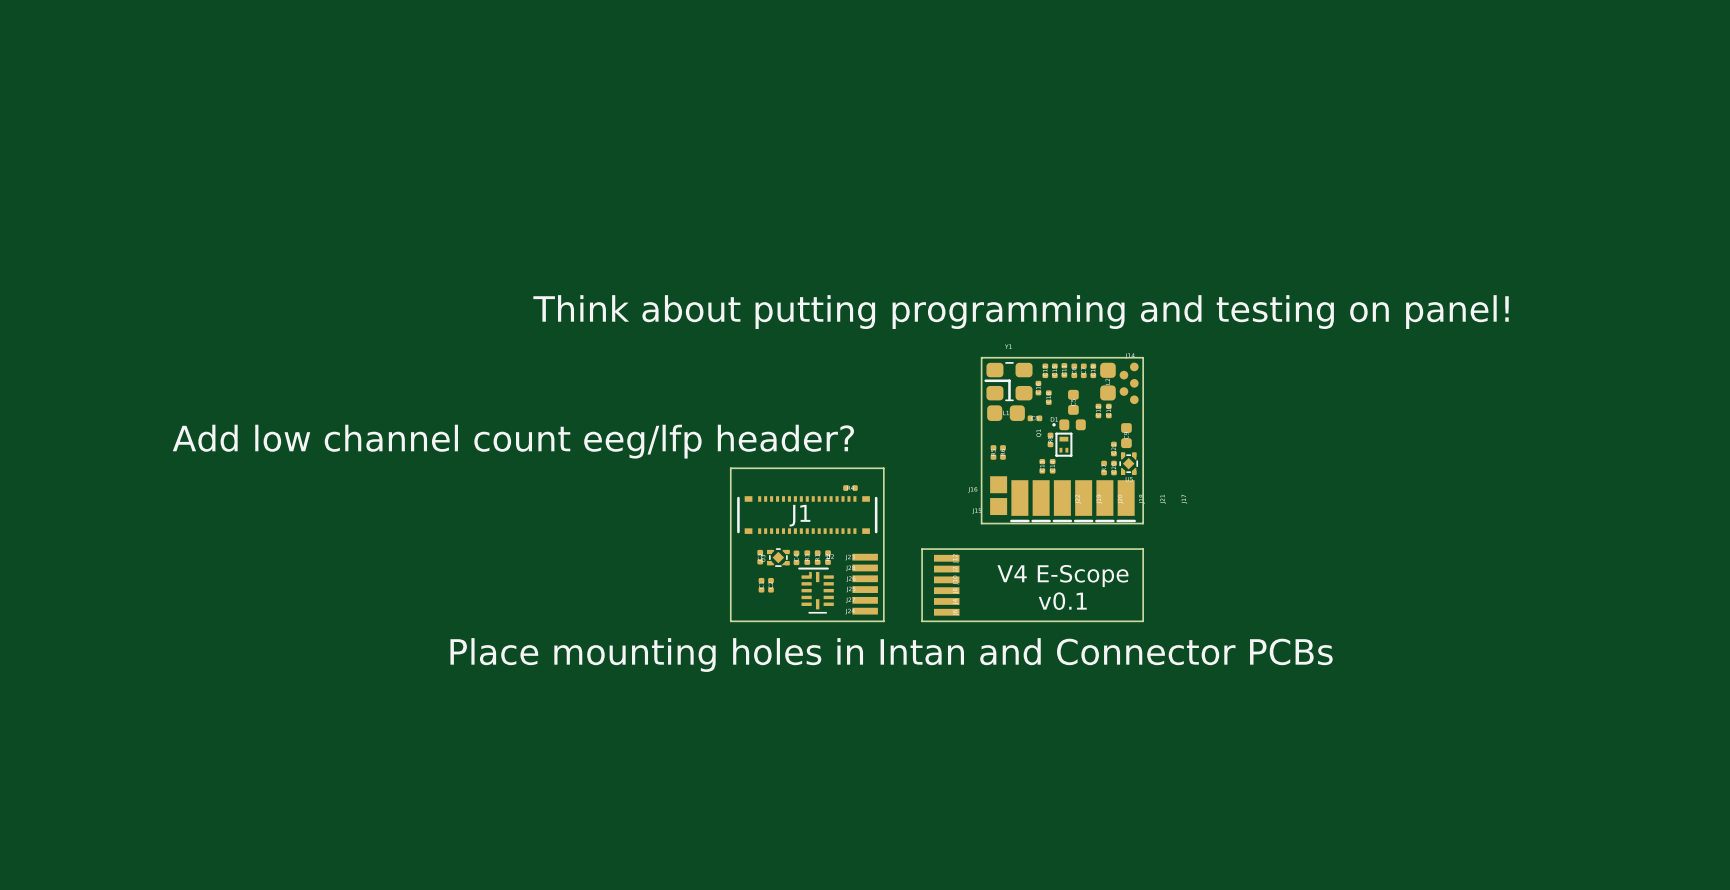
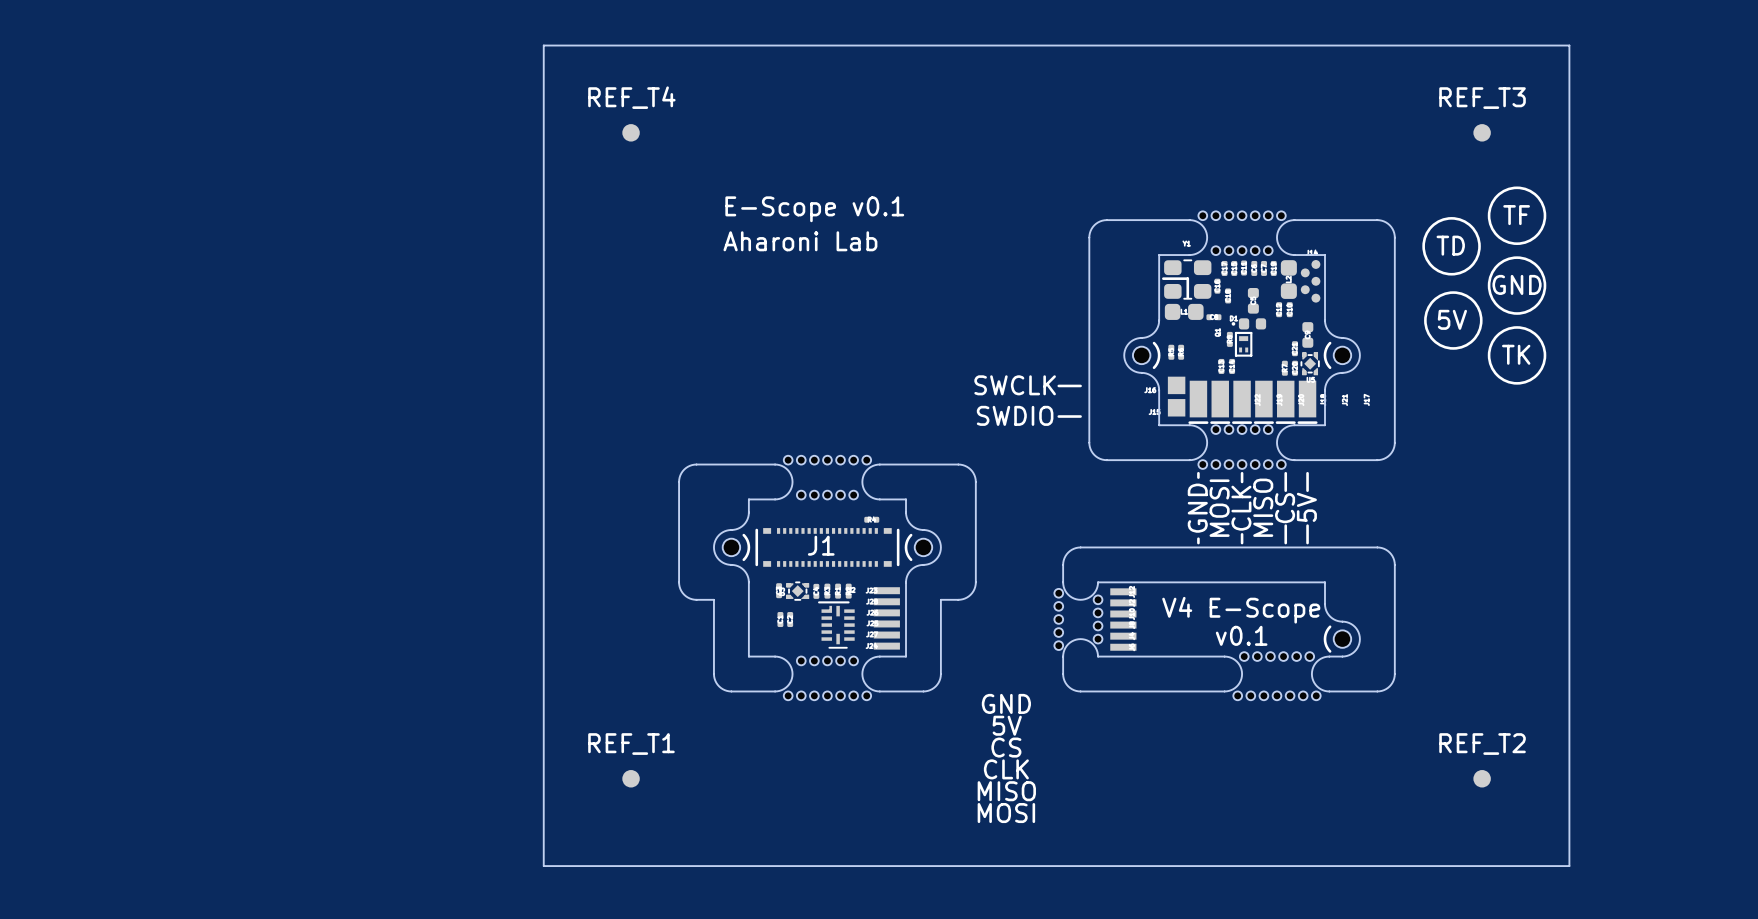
board edge: none -> (543, 45) (543, 866) (1569, 866) (1569, 45) (543, 45)
REF_T4: none -> (631, 132)
REF_T3: none -> (1482, 132)
drawing: none -> [1422, 186, 1547, 385]
text: none -> E-Scope v0.1 (814, 209)
part: none -> (1202, 215)
part: none -> (1215, 215)
part: none -> (1228, 215)
part: none -> (1242, 215)
part: none -> (1255, 215)
part: none -> (1268, 215)
part: none -> (1281, 215)
text: none -> TF (1516, 215)
board edge: none -> (1106, 220) (1191, 220) (1200, 223) (1205, 230) (1206, 242) (1198, 252) (1189, 255) (1159, 255) (1157, 327) (1150, 335) (1131, 341) (1126, 346) (1124, 355) (1126, 364) (1131, 369) (1148, 374) (1156, 381) (1159, 390) (1159, 425) (1191, 425) (1203, 432) (1207, 440) (1206, 447) (1203, 453) (1196, 458) (1104, 460) (1096, 456) (1090, 449) (1089, 235) (1094, 225) (1106, 220)
board edge: none -> (1294, 220) (1379, 220) (1388, 223) (1393, 230) (1394, 442) (1391, 453) (1384, 458) (1292, 460) (1283, 456) (1278, 449) (1277, 438) (1285, 427) (1294, 425) (1325, 425) (1325, 390) (1327, 381) (1335, 374) (1353, 369) (1359, 357) (1359, 350) (1354, 343) (1349, 339) (1333, 335) (1325, 325) (1325, 255) (1289, 254) (1282, 249) (1278, 244) (1277, 235) (1280, 226) (1287, 221) (1294, 220)
text: none -> Aharoni Lab (800, 241)
text: none -> TD (1450, 245)
part: none -> (1215, 250)
part: none -> (1228, 250)
part: none -> (1242, 250)
part: none -> (1255, 250)
part: none -> (1268, 250)
text: none -> GND (1517, 284)
text: none -> 5V (1452, 319)
text: Think about putting programming and testing on panel! (1021, 312) -> none
line: none -> (1154, 343) (1159, 355) (1154, 367)
line: none -> (1330, 343) (1325, 355) (1330, 367)
part: none -> (1141, 355)
part: none -> (1342, 355)
text: none -> TK (1516, 354)
board edge: (981, 357) (981, 523) (1143, 523) (1143, 357) (981, 357) -> none
text: none -> SWCLK (1015, 385)
line: none -> (1058, 385) (1080, 385)
part position: (1045, 370) -> (1224, 268)
part position: (1054, 370) -> (1234, 268)
part position: (1064, 370) -> (1244, 268)
part position: (1074, 370) -> (1254, 268)
part position: (1083, 370) -> (1264, 268)
part position: (1093, 370) -> (1273, 268)
part position: (1008, 381) -> (1186, 279)
part position: (1107, 381) -> (1288, 279)
part position: (1129, 383) -> (1310, 281)
text: none -> SWDIO (1015, 415)
line: none -> (1058, 416) (1080, 416)
part position: (1038, 388) -> (1217, 286)
part position: (1048, 397) -> (1228, 295)
part: none -> (1215, 429)
part: none -> (1228, 429)
part: none -> (1242, 429)
part: none -> (1255, 429)
part: none -> (1268, 429)
part position: (1073, 402) -> (1253, 300)
part position: (1098, 410) -> (1279, 309)
part position: (1108, 410) -> (1289, 309)
part position: (1006, 413) -> (1184, 311)
part position: (1034, 418) -> (1213, 317)
part position: (1069, 424) -> (1248, 323)
part: none -> (788, 460)
part: none -> (801, 460)
part: none -> (814, 460)
part: none -> (827, 460)
part: none -> (840, 460)
part: none -> (853, 460)
part: none -> (866, 460)
part: none -> (1202, 464)
part: none -> (1215, 464)
part: none -> (1228, 464)
part: none -> (1242, 464)
part: none -> (1255, 464)
part: none -> (1268, 464)
part: none -> (1281, 464)
part position: (1126, 435) -> (1307, 334)
part position: (1050, 439) -> (1229, 339)
text: Add low channel count eeg/lfp header? (513, 441) -> none
line: none -> (1198, 473) (1198, 477)
line: none -> (1242, 473) (1242, 481)
line: none -> (1285, 473) (1285, 490)
line: none -> (1307, 473) (1307, 490)
part position: (1063, 444) -> (1243, 344)
part position: (1113, 448) -> (1294, 348)
part position: (993, 452) -> (1171, 352)
part position: (1003, 452) -> (1181, 352)
part position: (1128, 463) -> (1310, 363)
part: none -> (801, 495)
part: none -> (814, 495)
part: none -> (827, 495)
part: none -> (840, 495)
part: none -> (853, 495)
part position: (1042, 466) -> (1221, 366)
part position: (1052, 466) -> (1232, 366)
board edge: (756, 468) (858, 468) -> (775, 499) (787, 494) (792, 484) (788, 471) (779, 465) (694, 464) (684, 469) (679, 477) (679, 584) (682, 592) (689, 598) (713, 599) (713, 674) (716, 682) (720, 687) (729, 691) (781, 690) (790, 682) (792, 671) (785, 660) (775, 656)
part position: (1104, 468) -> (1284, 368)
part position: (1114, 468) -> (1295, 368)
text: none -> CLK (1241, 508)
text: none -> 5V (1306, 507)
text: none -> GND (1197, 508)
text: none -> MOSI (1219, 508)
text: none -> MISO (1263, 507)
text: none -> CS (1285, 508)
board edge: (730, 481) (730, 549) -> (748, 512) (743, 524) (738, 528) (720, 533) (715, 540) (713, 547) (719, 559) (724, 563) (742, 568) (747, 575) (748, 582)
board edge: (883, 481) (883, 549) -> (906, 512) (911, 524) (916, 528) (934, 533) (939, 540) (940, 547) (935, 559) (930, 563) (912, 568) (907, 575) (906, 582)
part position: (998, 484) -> (1176, 385)
line: none -> (1285, 525) (1285, 543)
line: none -> (1307, 525) (1307, 543)
part position: (1019, 501) -> (1198, 402)
part position: (1041, 501) -> (1220, 402)
part position: (1062, 501) -> (1242, 402)
part position: (1083, 501) -> (1263, 402)
part position: (1104, 501) -> (1285, 402)
part position: (1126, 501) -> (1307, 402)
line: none -> (1242, 534) (1242, 543)
line: none -> (743, 535) (748, 547) (743, 559)
line: none -> (911, 535) (906, 547) (911, 559)
part position: (998, 506) -> (1176, 407)
line: none -> (1198, 538) (1198, 543)
part: none -> (731, 547)
part: none -> (923, 547)
board edge: (1070, 549) (922, 549) (922, 621) (1070, 621) -> (1098, 582) (1094, 592) (1087, 598) (1078, 599) (1068, 594) (1063, 582) (1063, 562) (1068, 552) (1080, 547) (1381, 548) (1391, 554) (1394, 562) (1393, 680) (1388, 687) (1377, 691) (1327, 691) (1315, 684) (1312, 671) (1317, 661) (1324, 657) (1349, 655) (1356, 649) (1359, 641) (1358, 632) (1354, 626) (1349, 622) (1333, 619) (1327, 612) (1325, 606) (1325, 582) (1172, 582)
board edge: (1143, 549) (1143, 621) -> (1098, 656) (1094, 645) (1087, 640) (1078, 639) (1068, 644) (1063, 656) (1063, 676) (1068, 686) (1080, 691) (1224, 691) (1235, 687) (1241, 678) (1239, 665) (1229, 657) (1172, 656)
part position: (946, 558) -> (1123, 591)
part: none -> (1058, 593)
part: none -> (1098, 599)
part position: (946, 569) -> (1123, 602)
part: none -> (1058, 606)
text position: V4 E-Scope (1062, 576) -> V4 E-Scope (1241, 610)
part: none -> (1098, 612)
part position: (946, 579) -> (1123, 613)
part: none -> (1058, 619)
part position: (946, 590) -> (1123, 625)
part: none -> (1098, 626)
line: none -> (1330, 626) (1325, 639) (1330, 651)
part: none -> (1058, 632)
part position: (946, 601) -> (1123, 636)
text position: v0.1 (1062, 601) -> v0.1 (1241, 635)
part: none -> (1098, 639)
part: none -> (1342, 639)
part: none -> (1058, 645)
part position: (946, 612) -> (1123, 647)
board edge: (756, 621) (858, 621) -> (879, 499) (867, 494) (862, 484) (865, 471) (875, 465) (960, 464) (970, 469) (975, 477) (975, 584) (972, 592) (965, 598) (940, 599) (940, 674) (938, 682) (934, 687) (925, 691) (873, 690) (864, 682) (862, 671) (869, 660) (879, 656)
part: none -> (1244, 656)
part: none -> (1257, 656)
part: none -> (1270, 656)
part: none -> (1283, 656)
part: none -> (1296, 656)
part: none -> (1309, 656)
part: none -> (801, 660)
part: none -> (814, 660)
part: none -> (827, 660)
part: none -> (840, 660)
part: none -> (853, 660)
text: Place mounting holes in Intan and Connector PCBs (891, 655) -> none
part: none -> (788, 695)
part: none -> (801, 695)
part: none -> (814, 695)
part: none -> (827, 695)
part: none -> (840, 695)
part: none -> (853, 695)
part: none -> (866, 695)
part: none -> (1237, 695)
part: none -> (1250, 695)
part: none -> (1263, 695)
part: none -> (1276, 695)
part: none -> (1290, 695)
part: none -> (1303, 695)
part: none -> (1316, 695)
text: none -> GND (1006, 703)
text: none -> 5V (1007, 725)
text: none -> CS (1006, 747)
text: none -> CLK (1006, 769)
REF_T1: none -> (631, 778)
REF_T2: none -> (1482, 778)
text: none -> MISO (1006, 791)
text: none -> MOSI (1006, 813)

